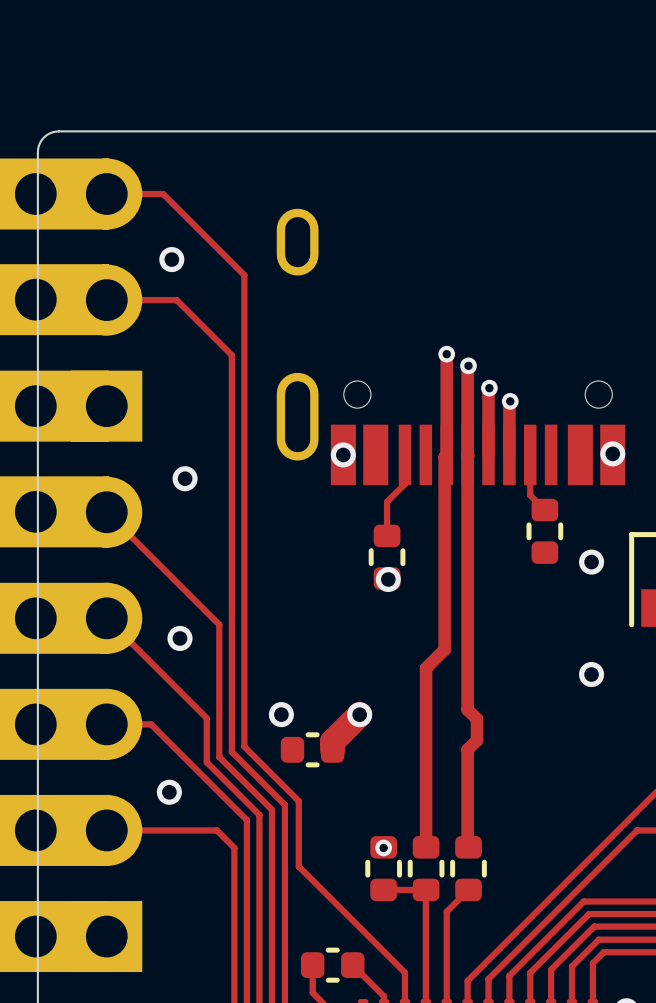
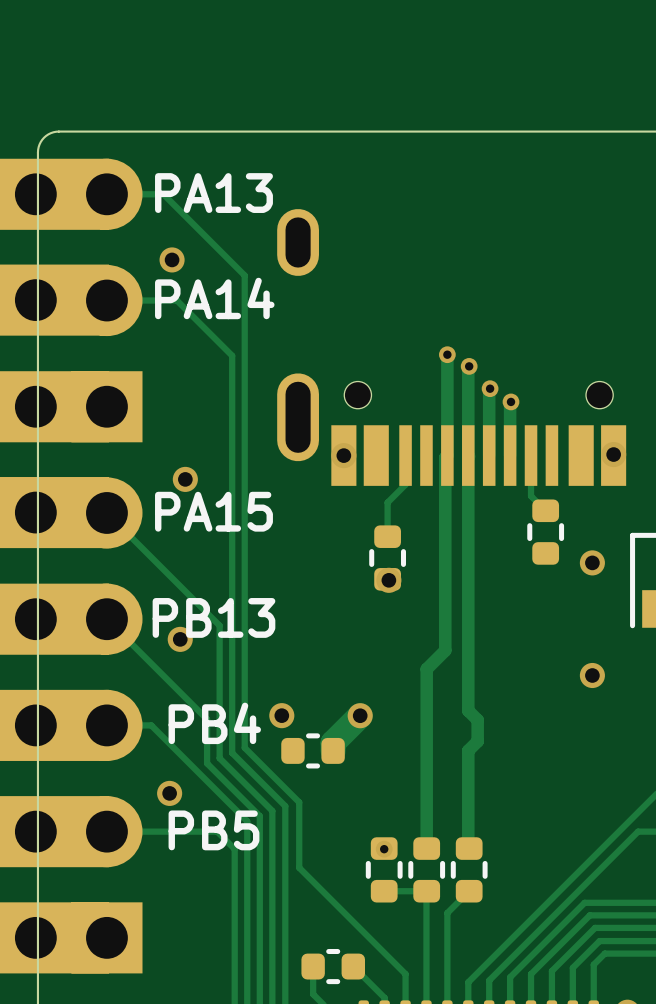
text: none -> PA13 (213, 193)
text: none -> PA14 (214, 298)
text: none -> PA15 (213, 511)
text: none -> PB13 (213, 617)
text: none -> PB4 (214, 723)
text: none -> PB5 (213, 830)

